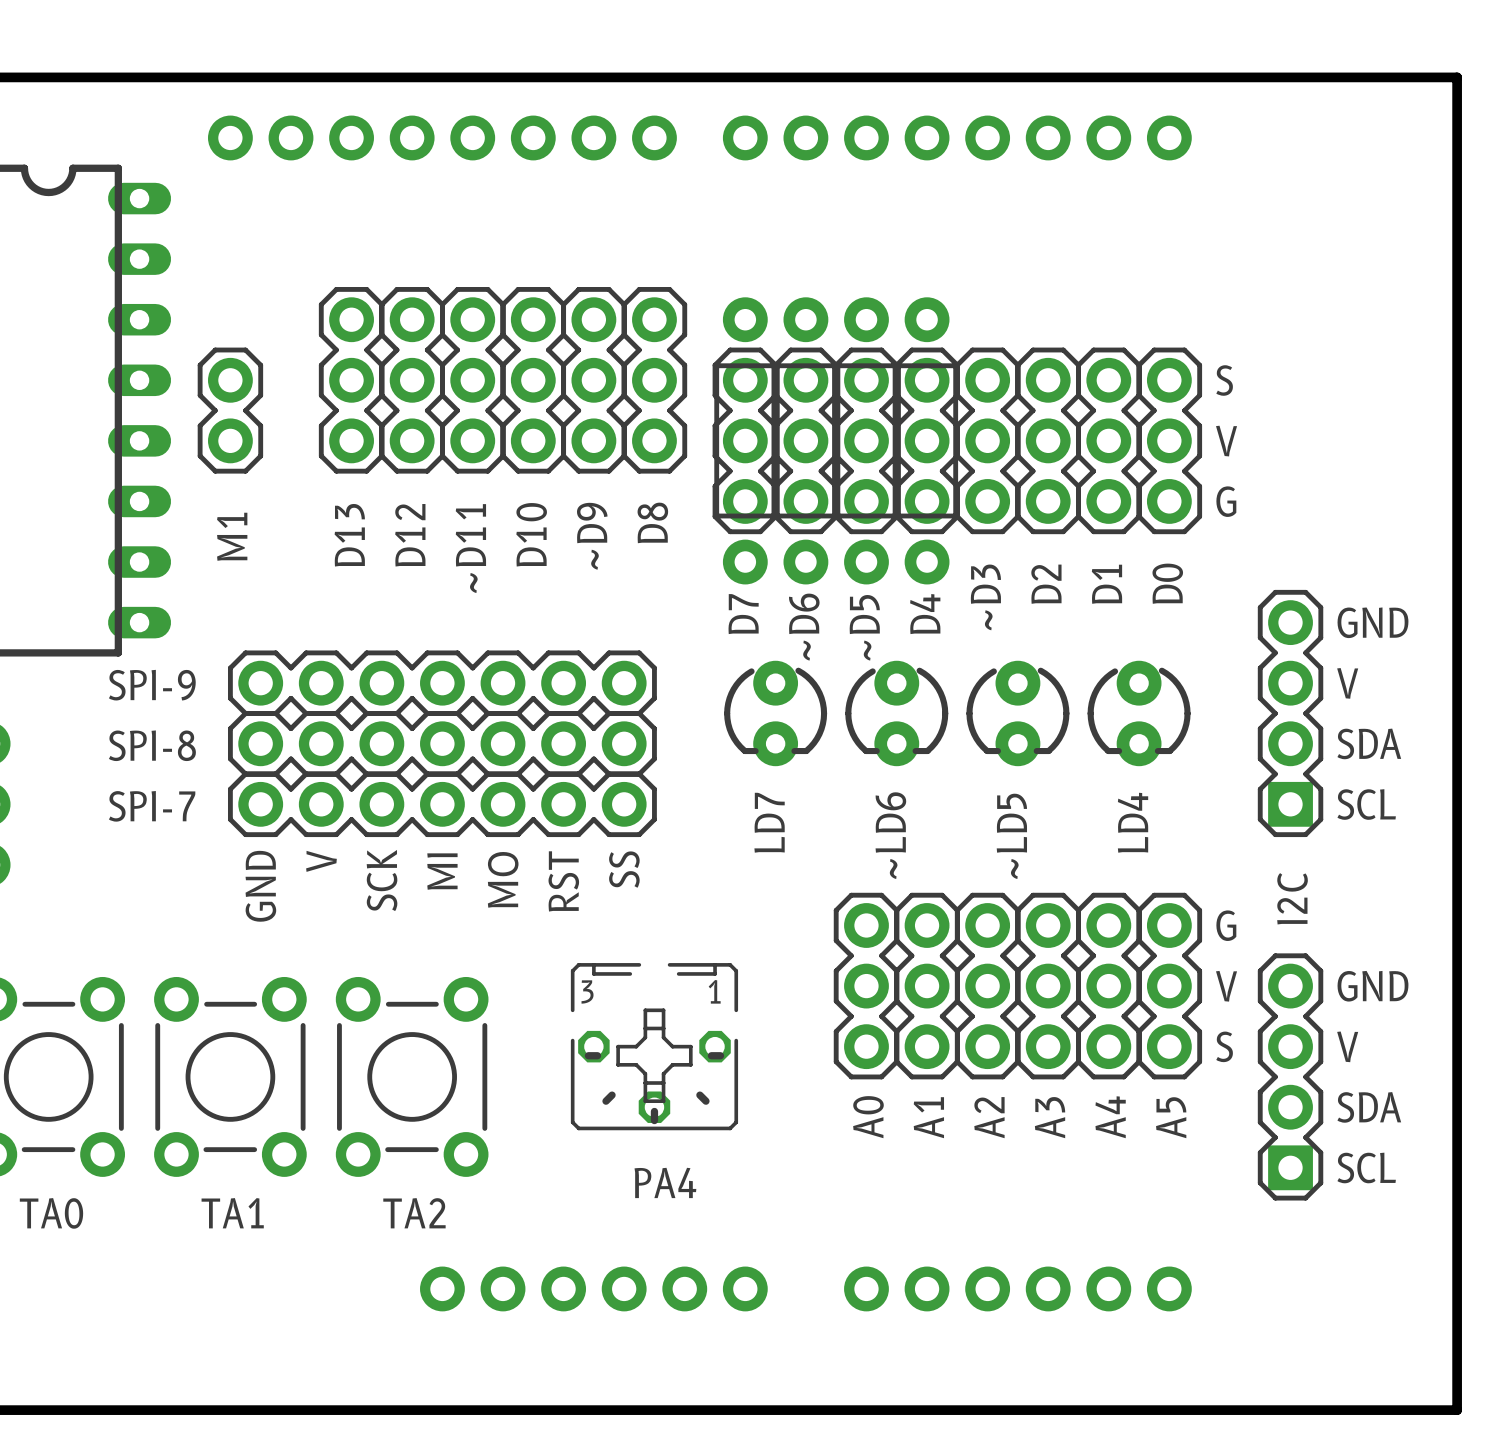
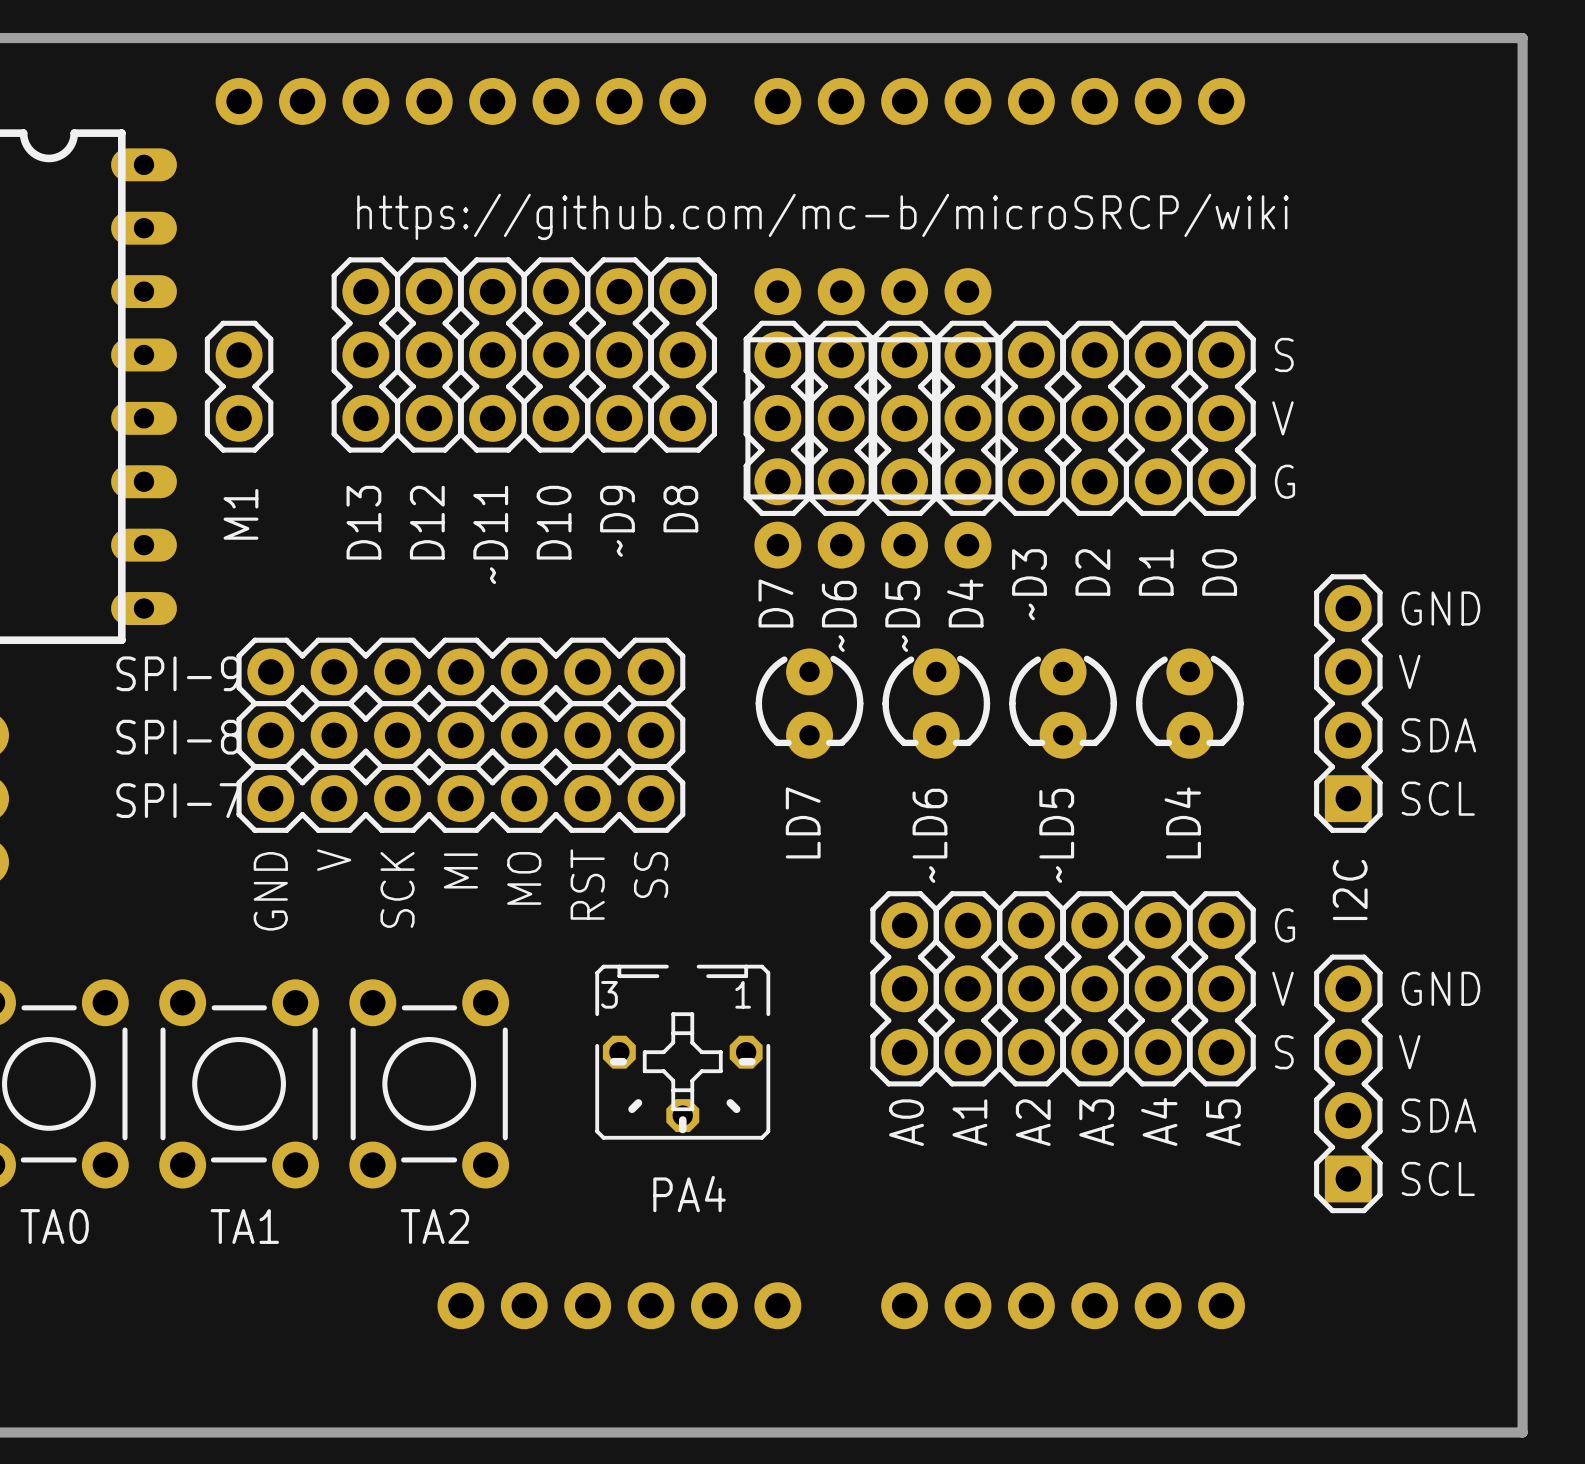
text: none -> https://github.com/mc-b/microSRCP/wiki (822, 216)

